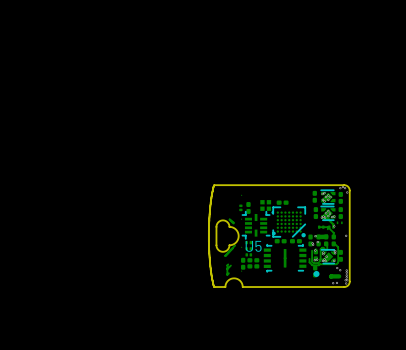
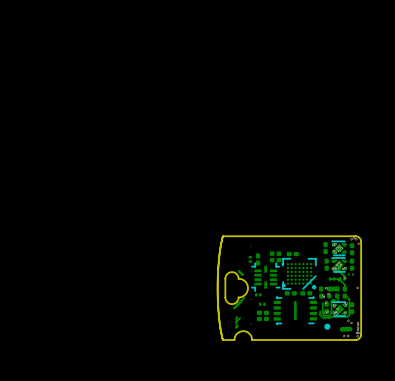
U5 name: U5 (253, 246) -> none
part: (248, 248) -> none
part: none -> (262, 304)
part: (248, 254) -> none
part: (243, 263) -> none
part: (315, 271) -> none

